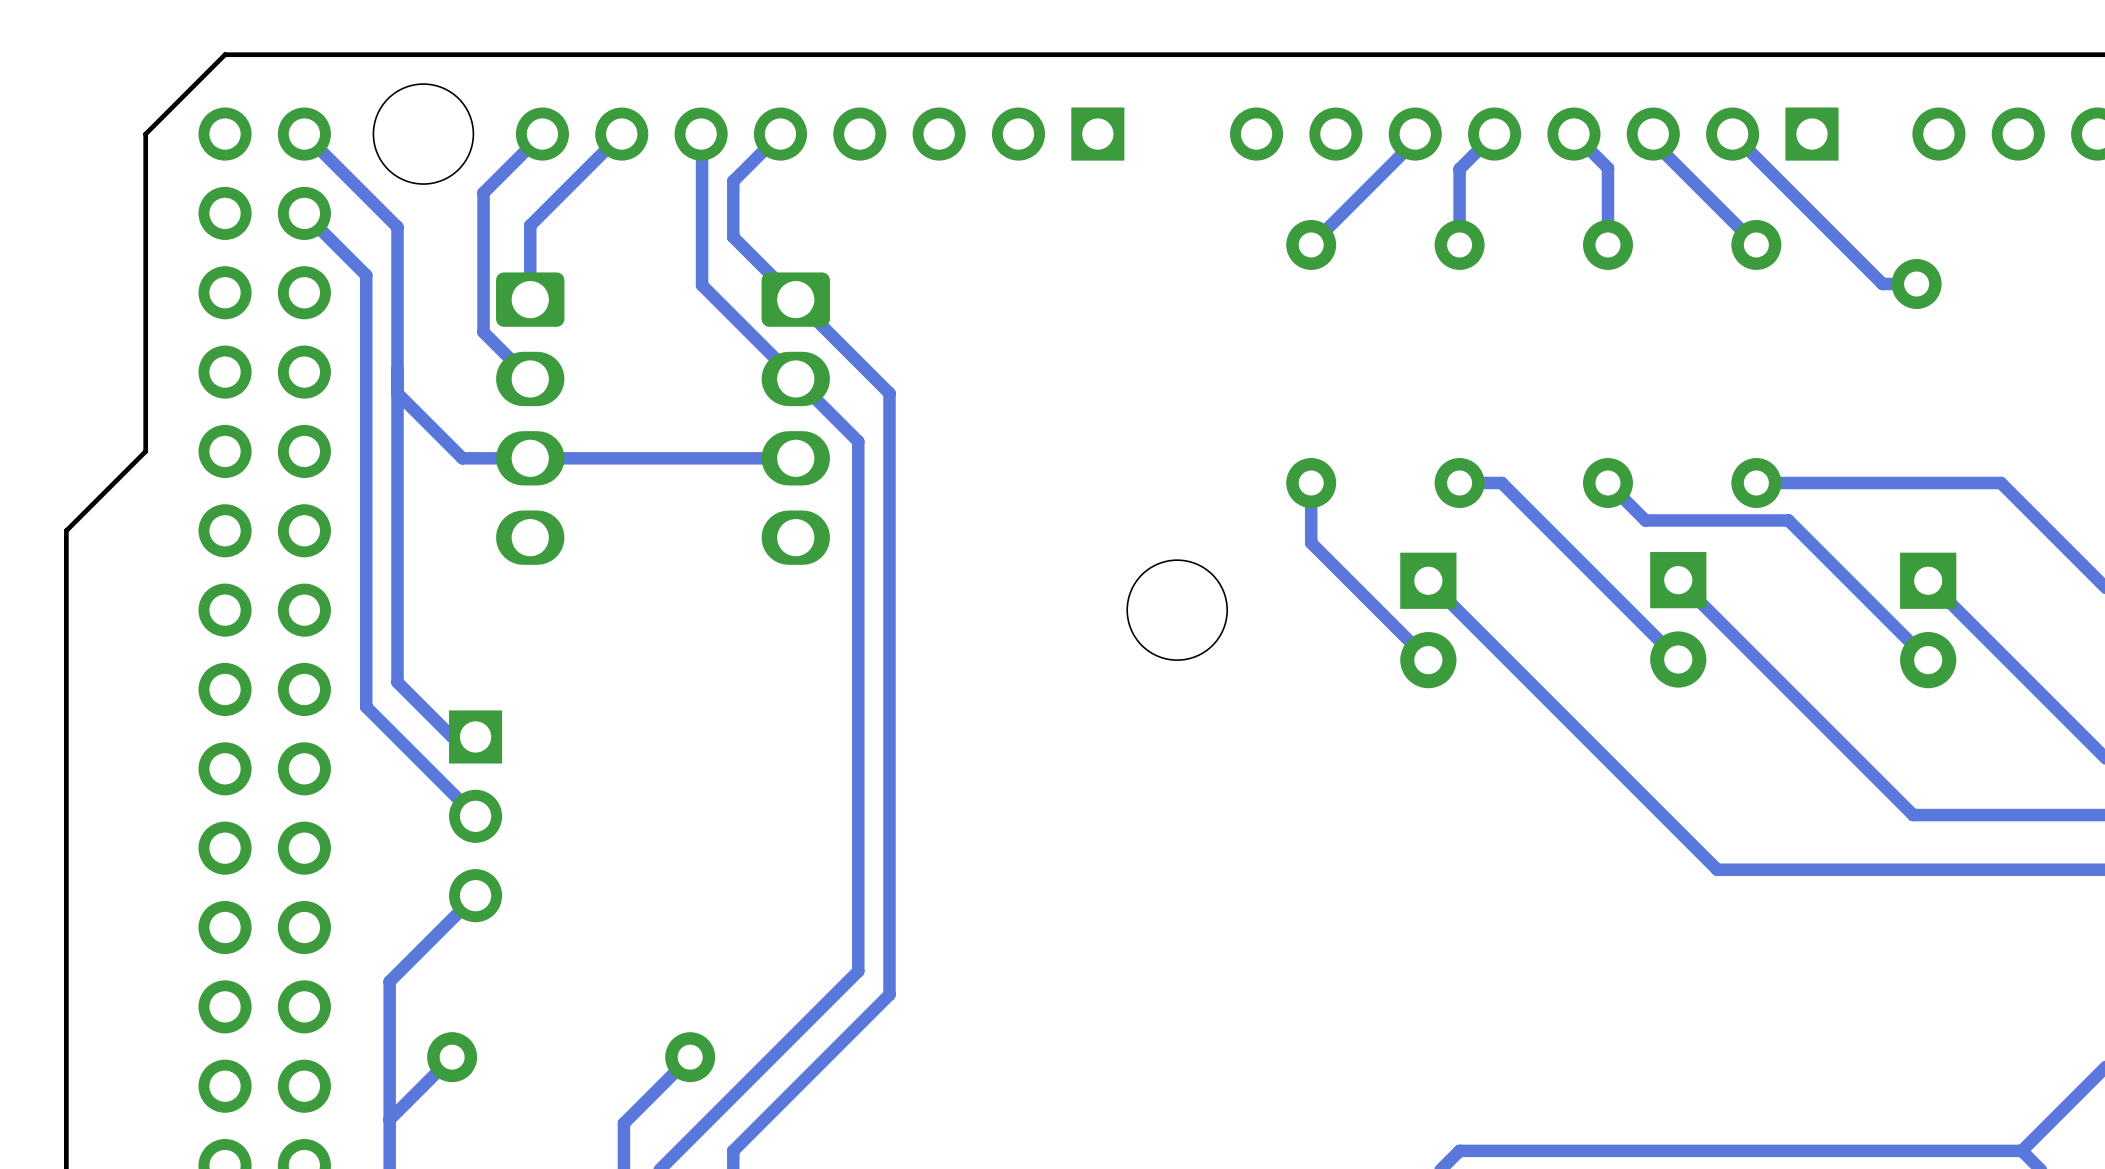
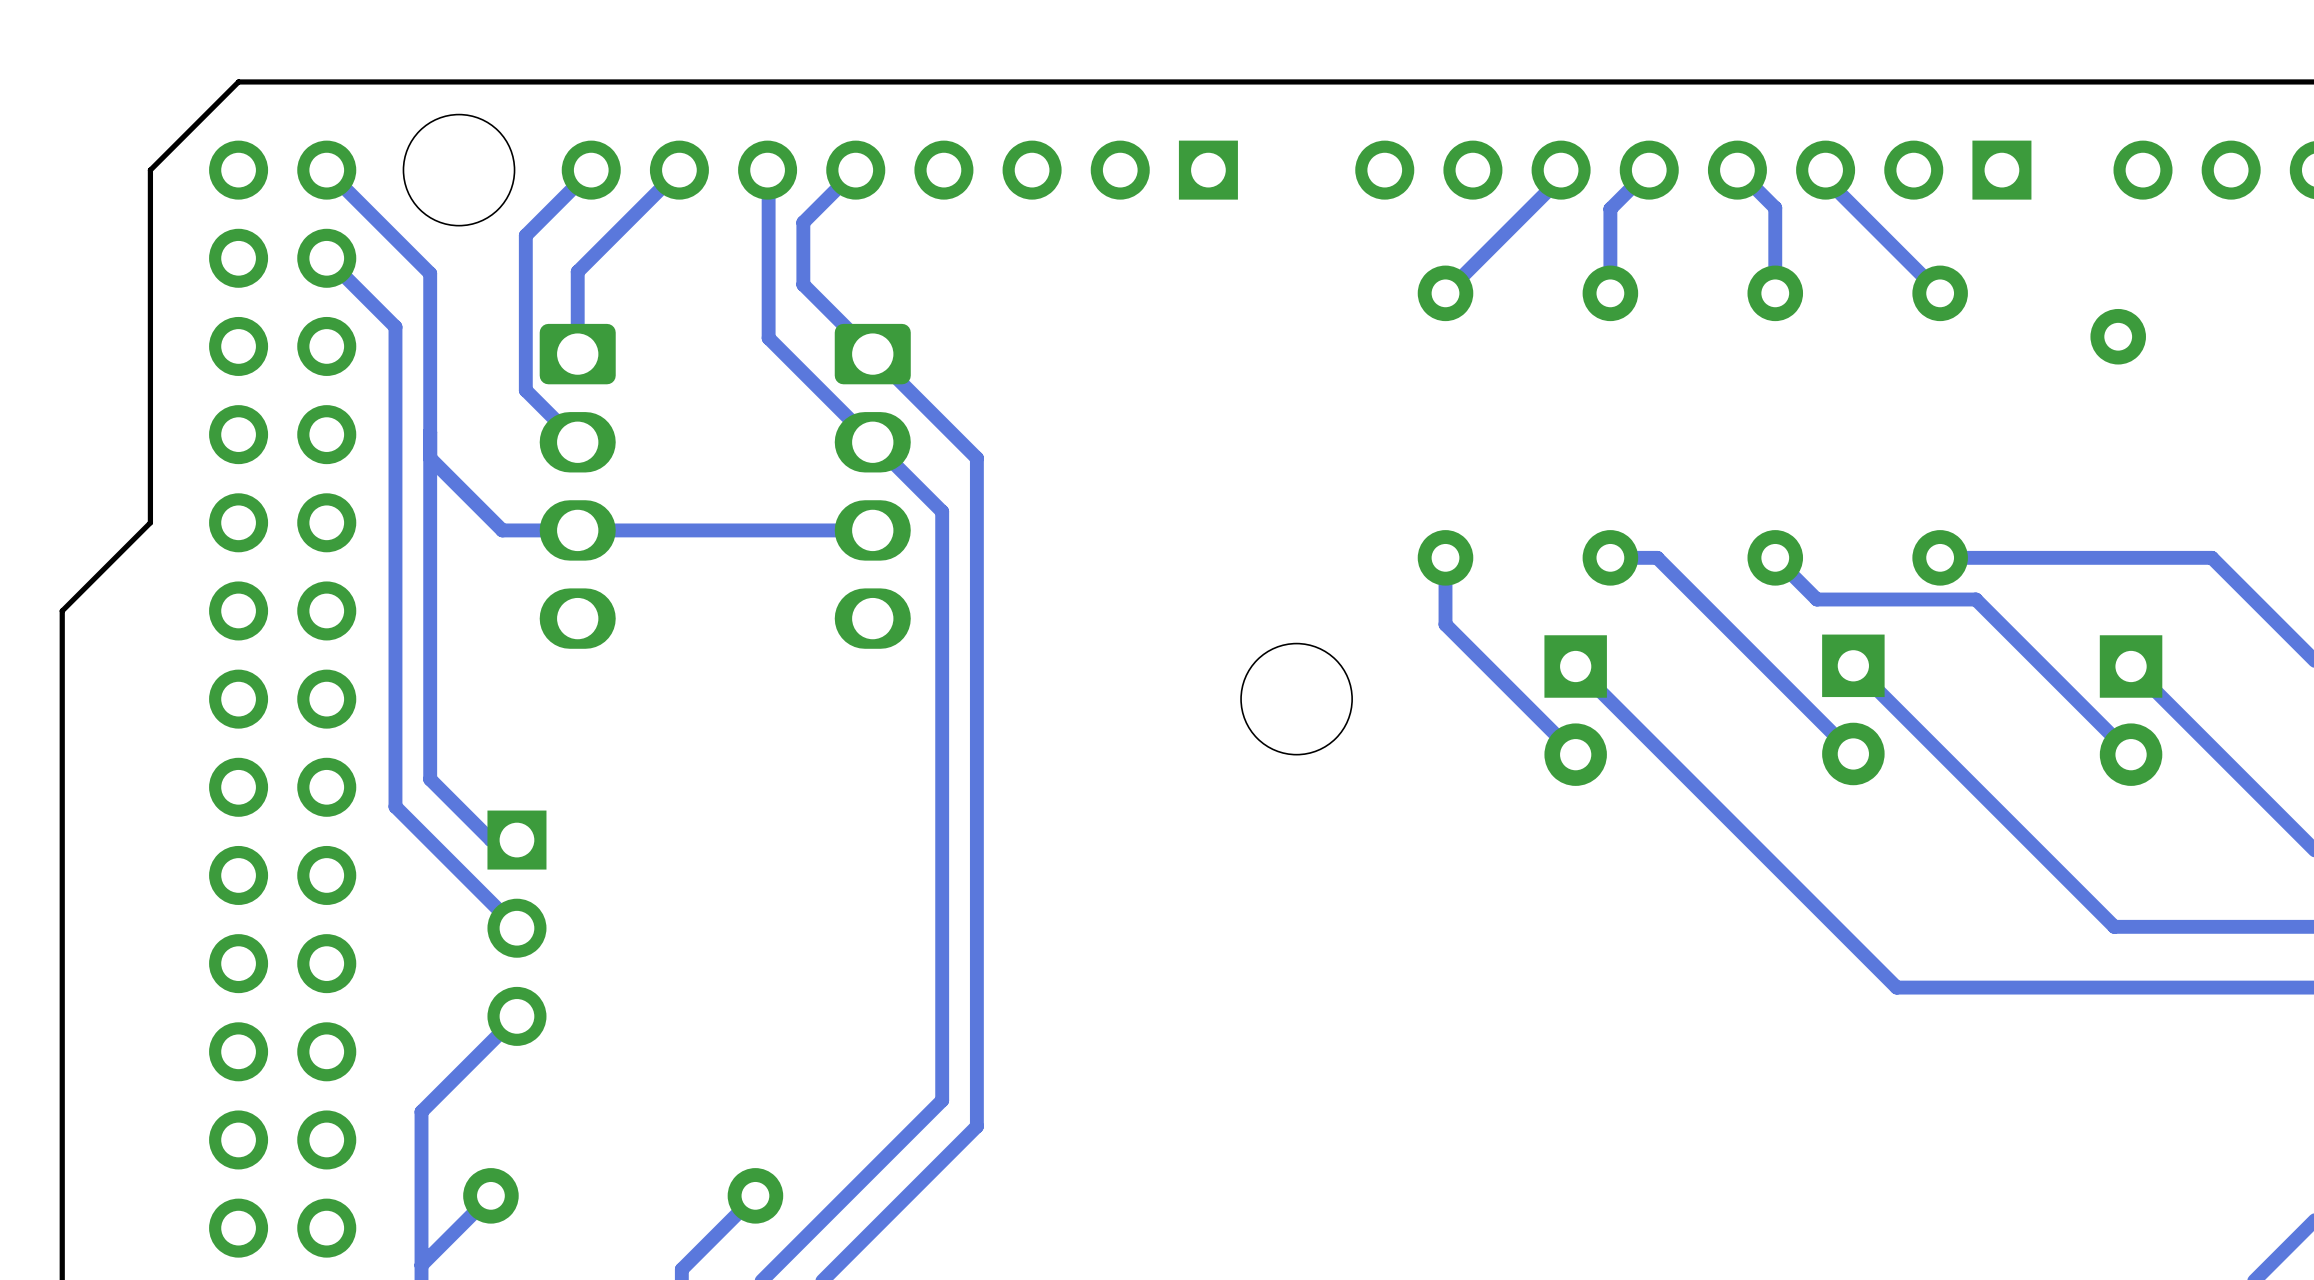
bottom track: (1732, 134) (1882, 284) (1916, 284) -> none

